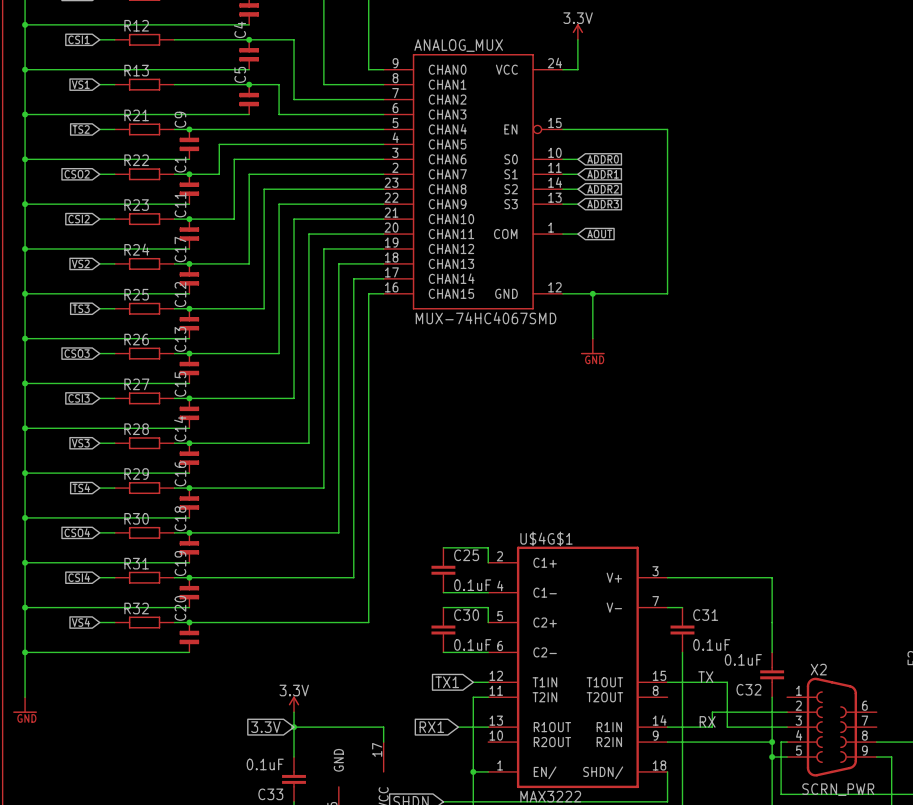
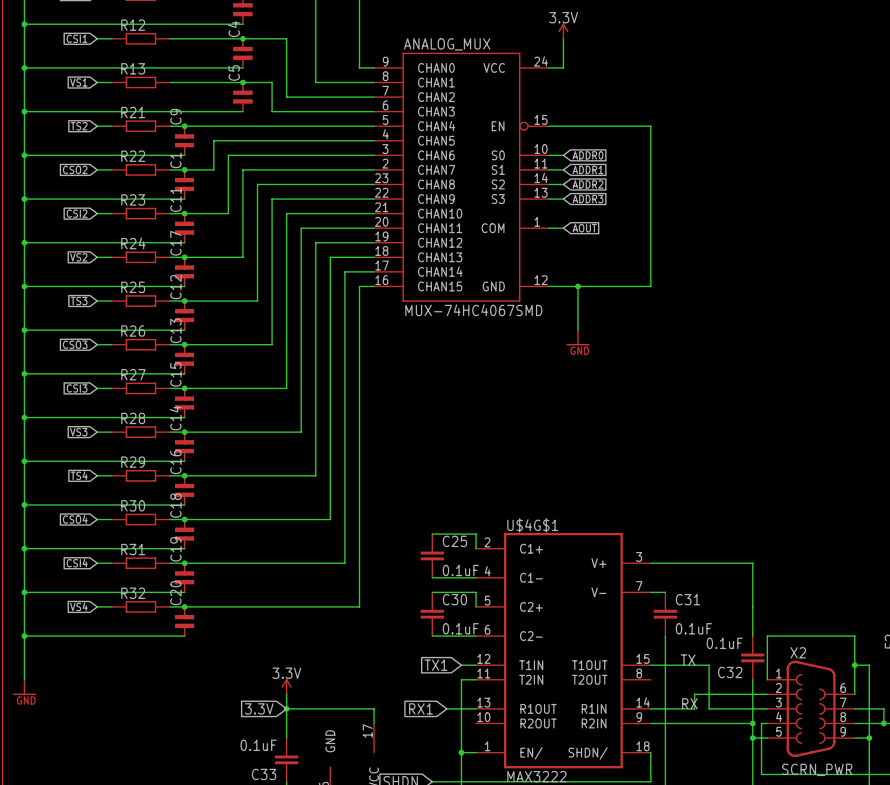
wire: none -> (854, 665) (869, 665) (869, 738)
junction: none -> (854, 665)
wire: none -> (767, 679) (767, 636) (854, 636) (854, 694)
wire: none -> (854, 708) (883, 708) (883, 723)
junction: none -> (883, 723)
junction: none -> (869, 738)

